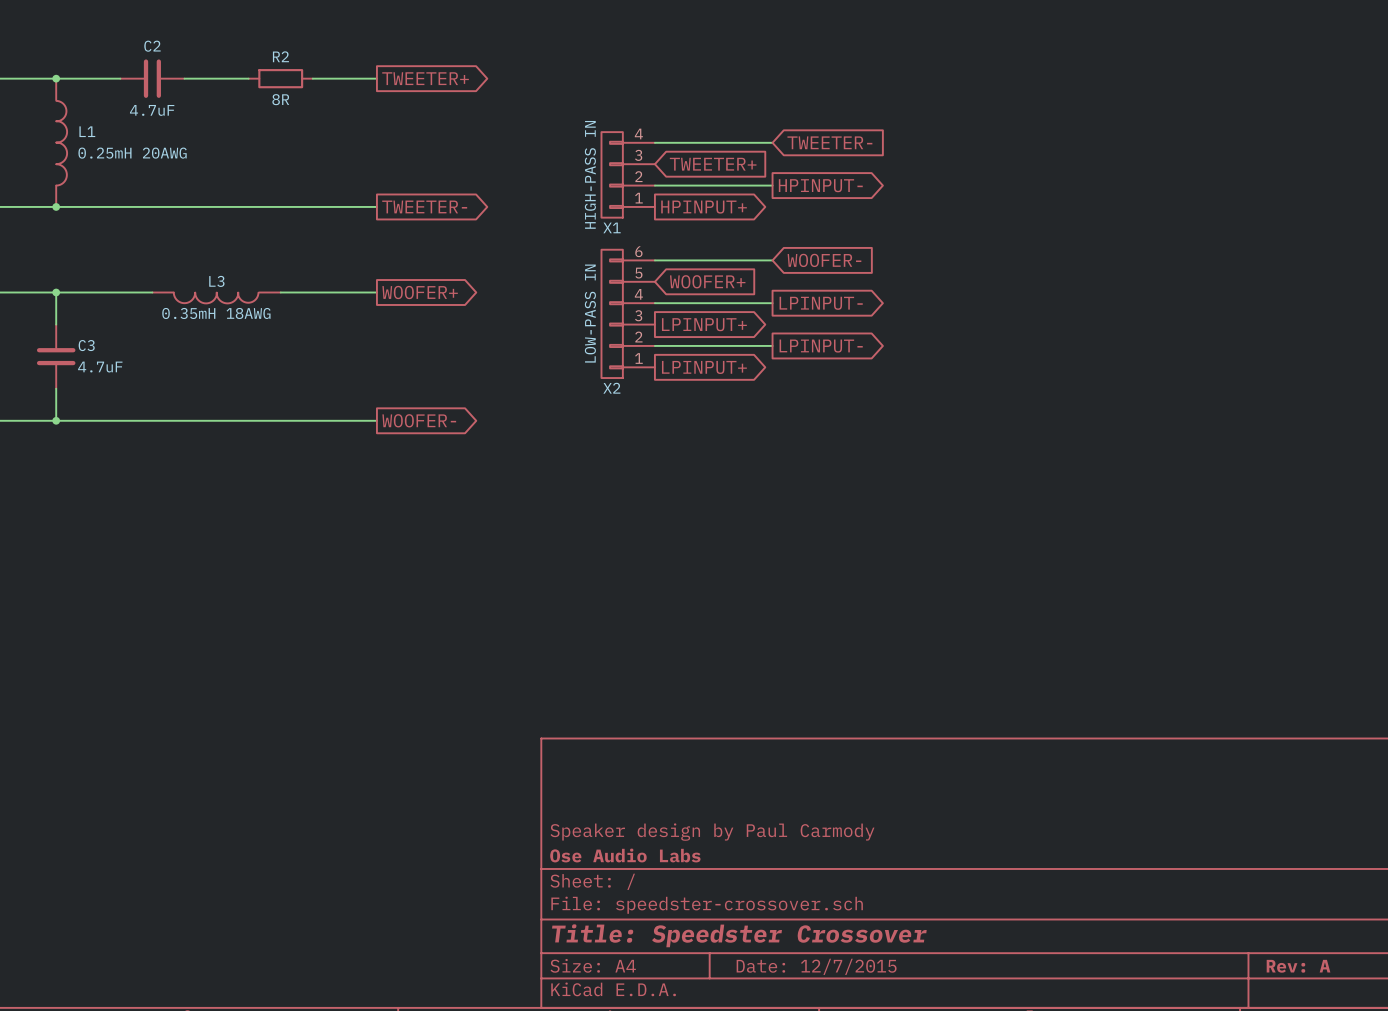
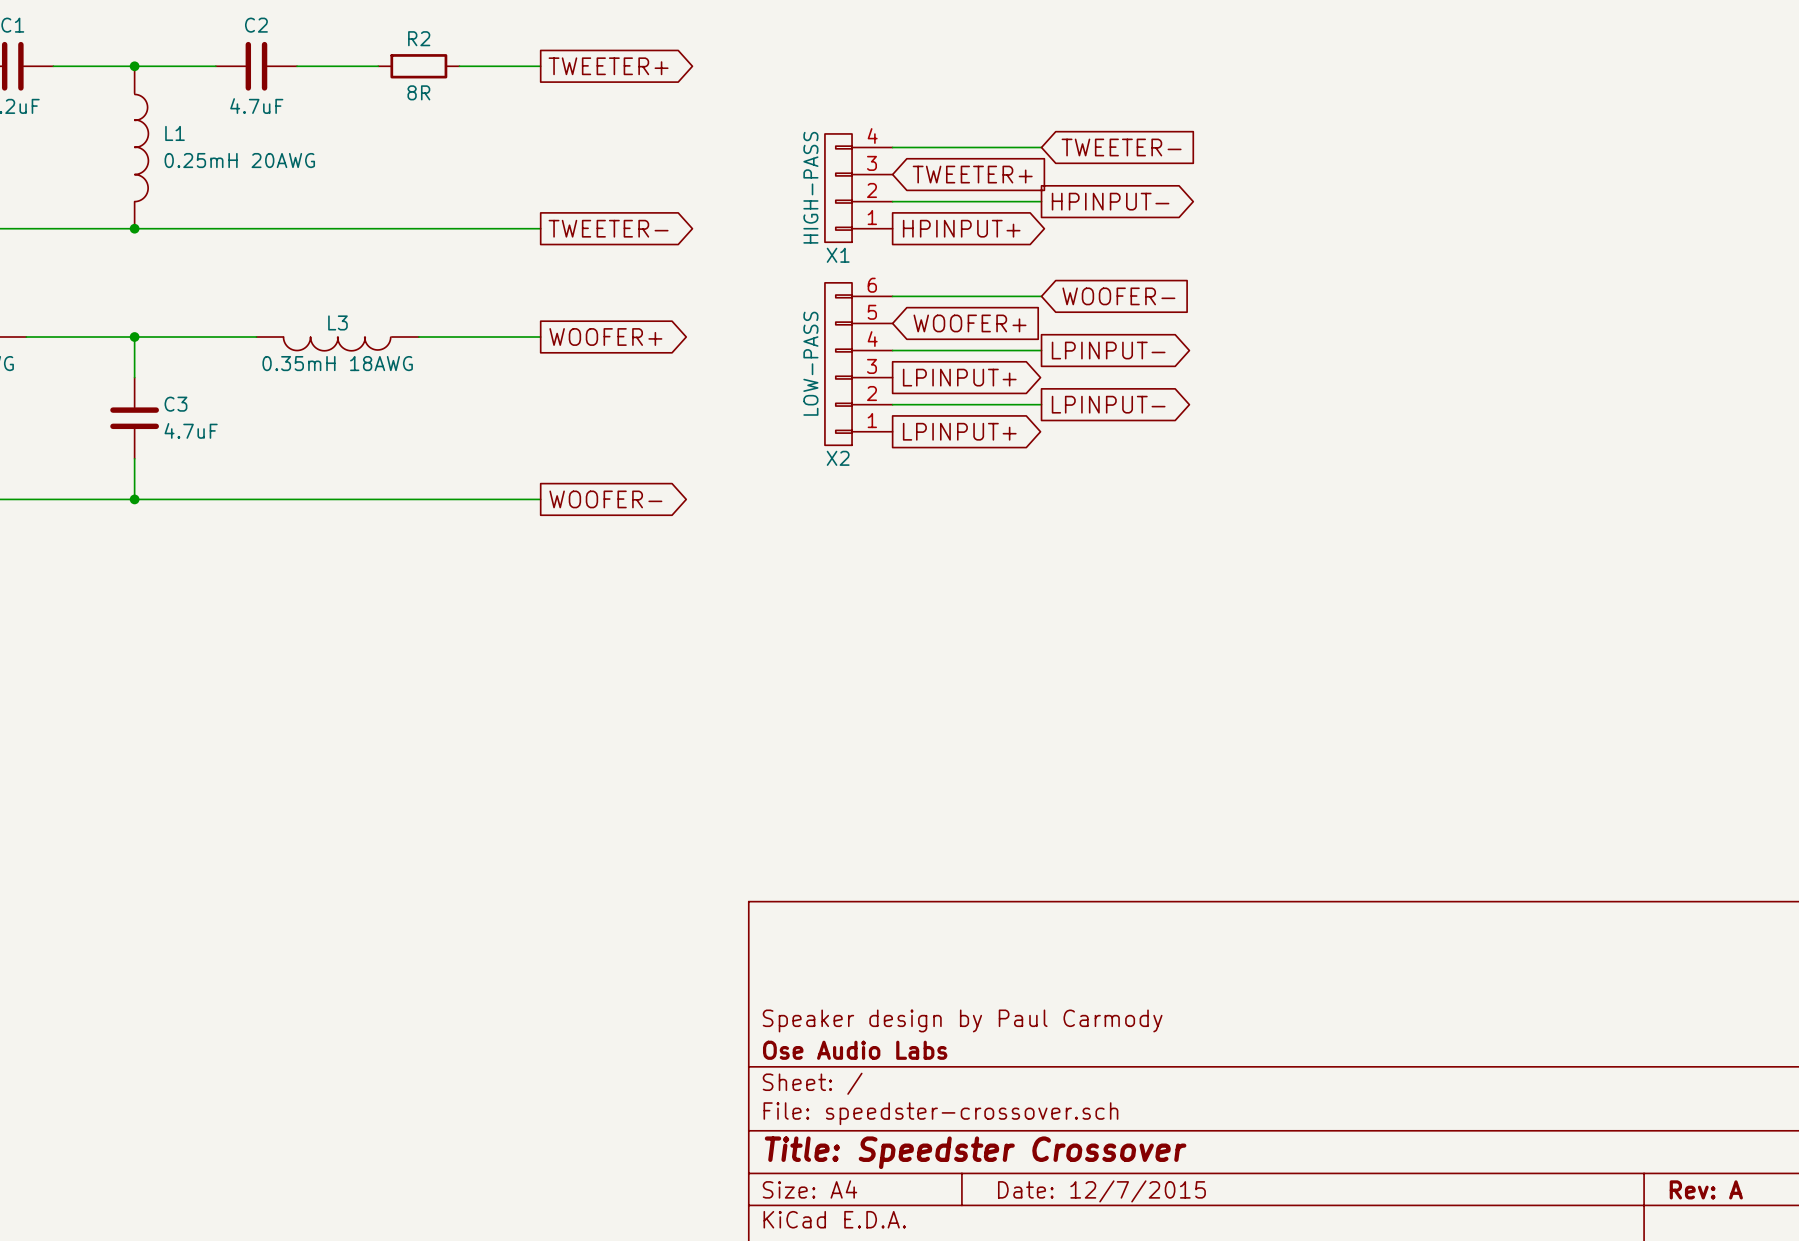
X1 value: HIGH-PASS IN (590, 174) -> HIGH-PASS (810, 187)
X2 value: LOW-PASS IN (590, 313) -> LOW-PASS (810, 363)

